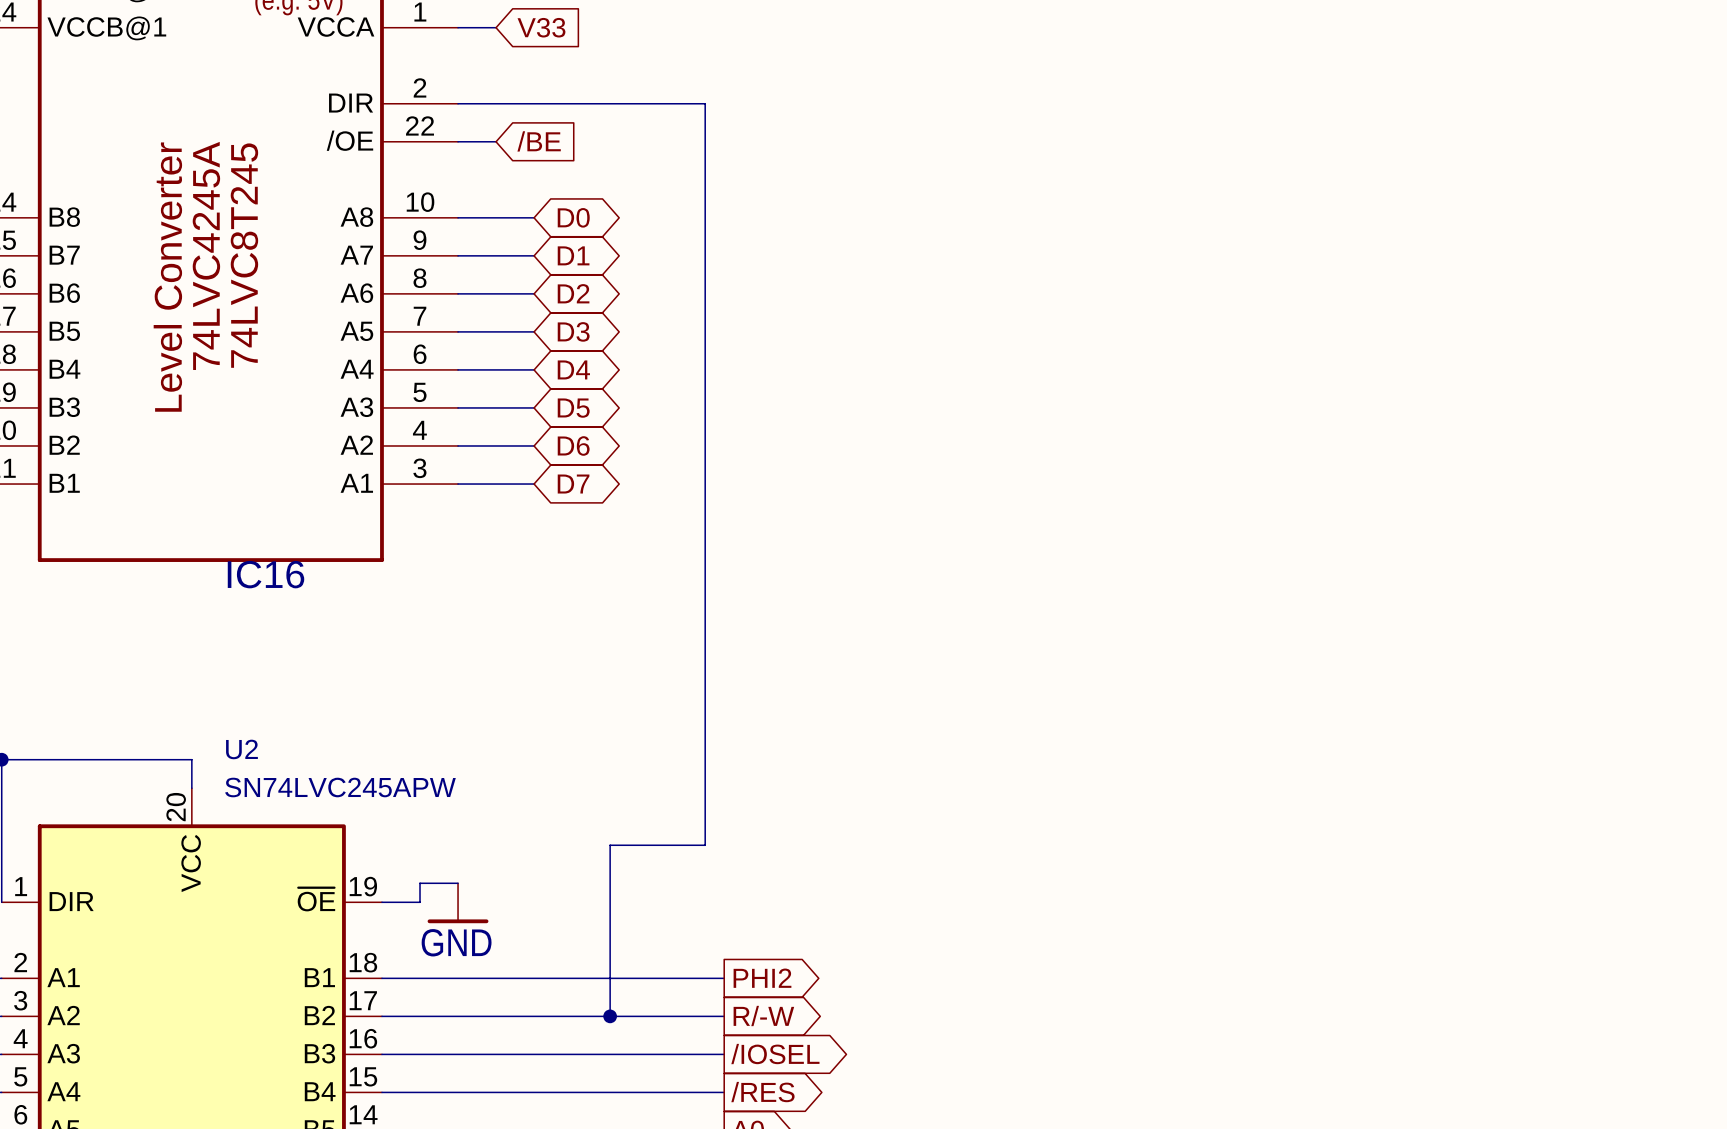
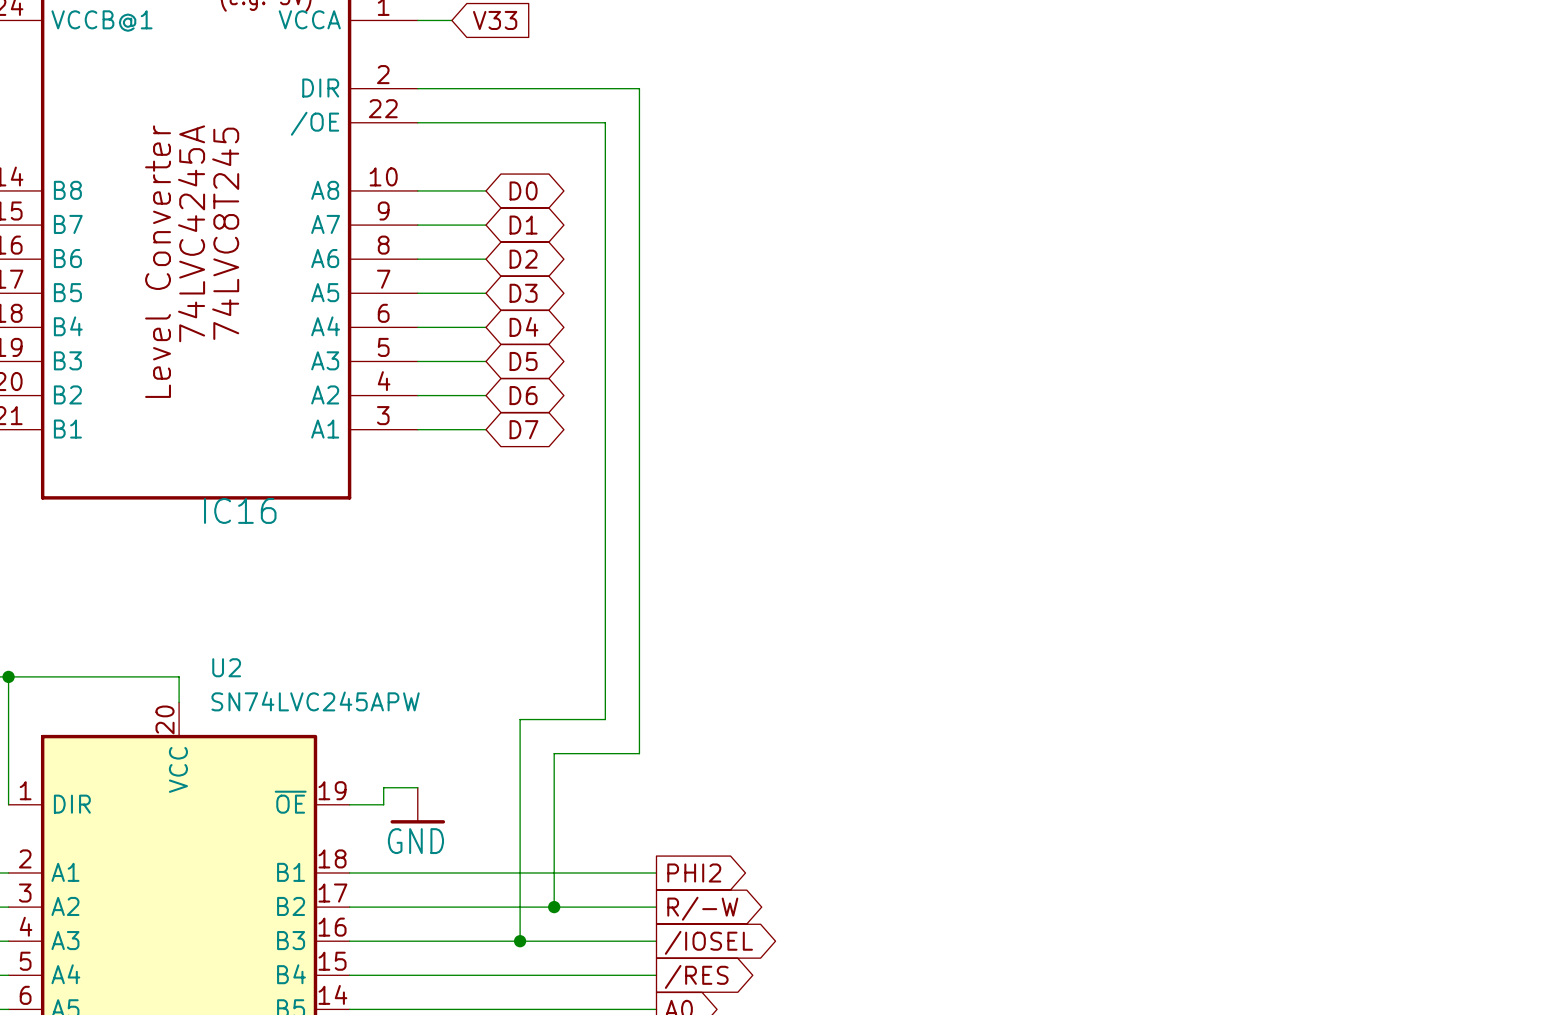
wire: none -> (451, 122) (605, 122) (605, 719) (520, 719) (520, 941)
global label: /BE (539, 141) -> none
junction: none -> (520, 941)

